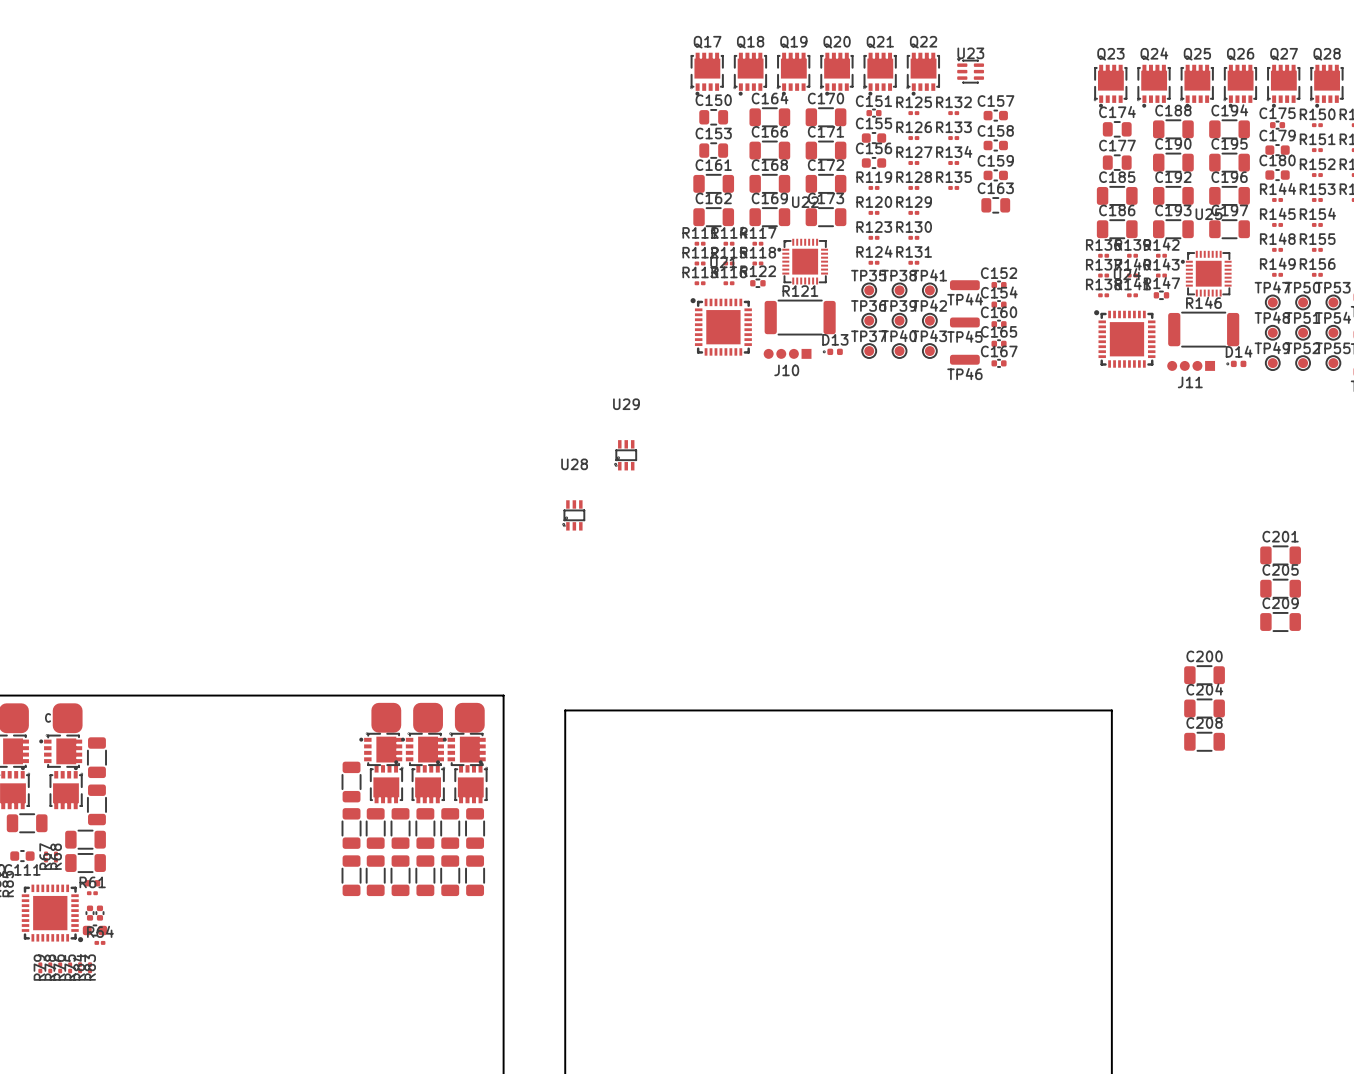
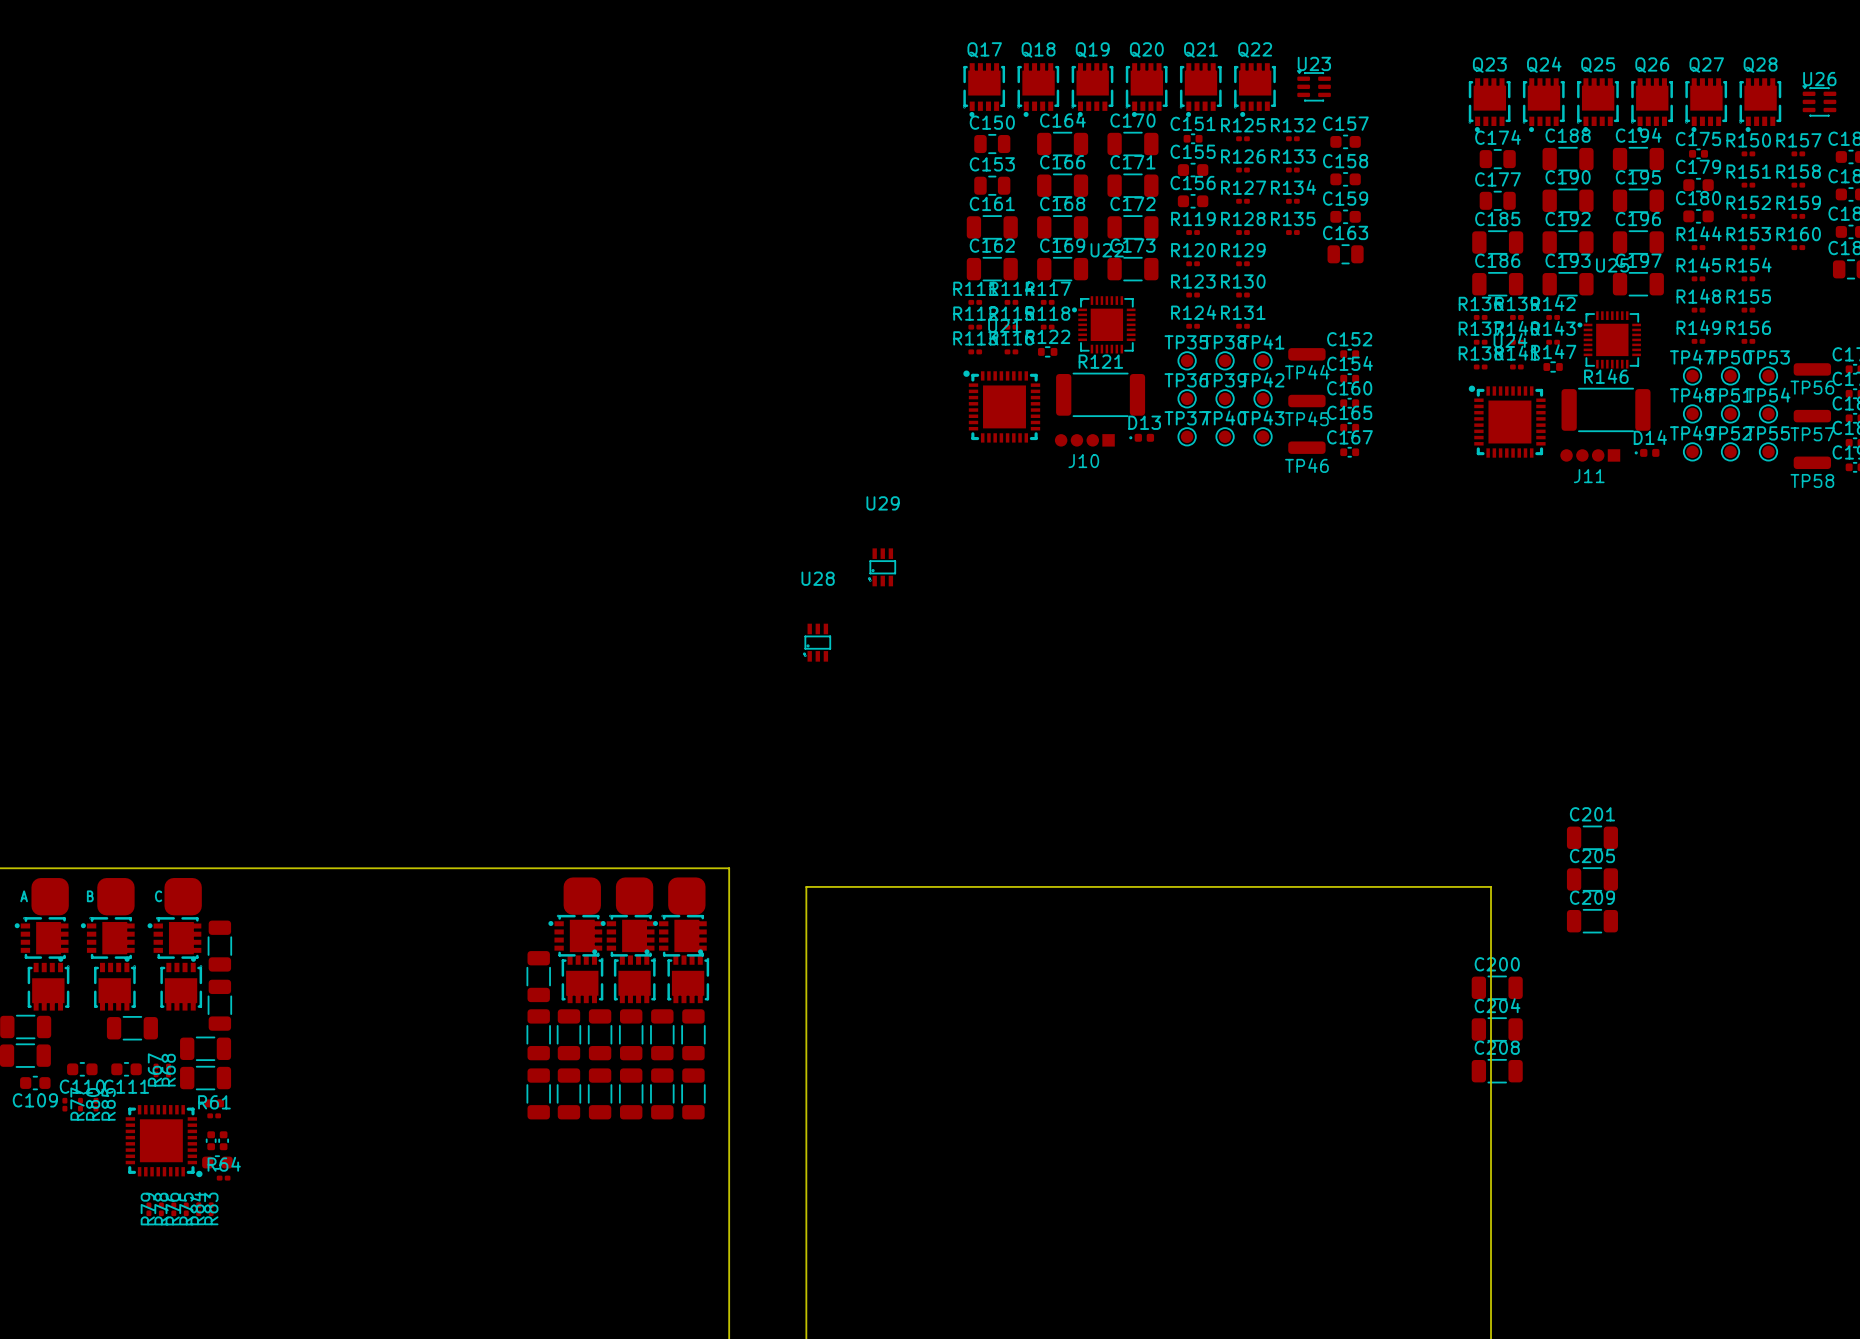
C201 position: (1280, 555) -> (1592, 837)
C205 position: (1280, 588) -> (1592, 879)
C209 position: (1280, 622) -> (1592, 921)
C200 position: (1204, 675) -> (1497, 987)
C204 position: (1204, 708) -> (1497, 1029)
C208 position: (1204, 741) -> (1497, 1071)

